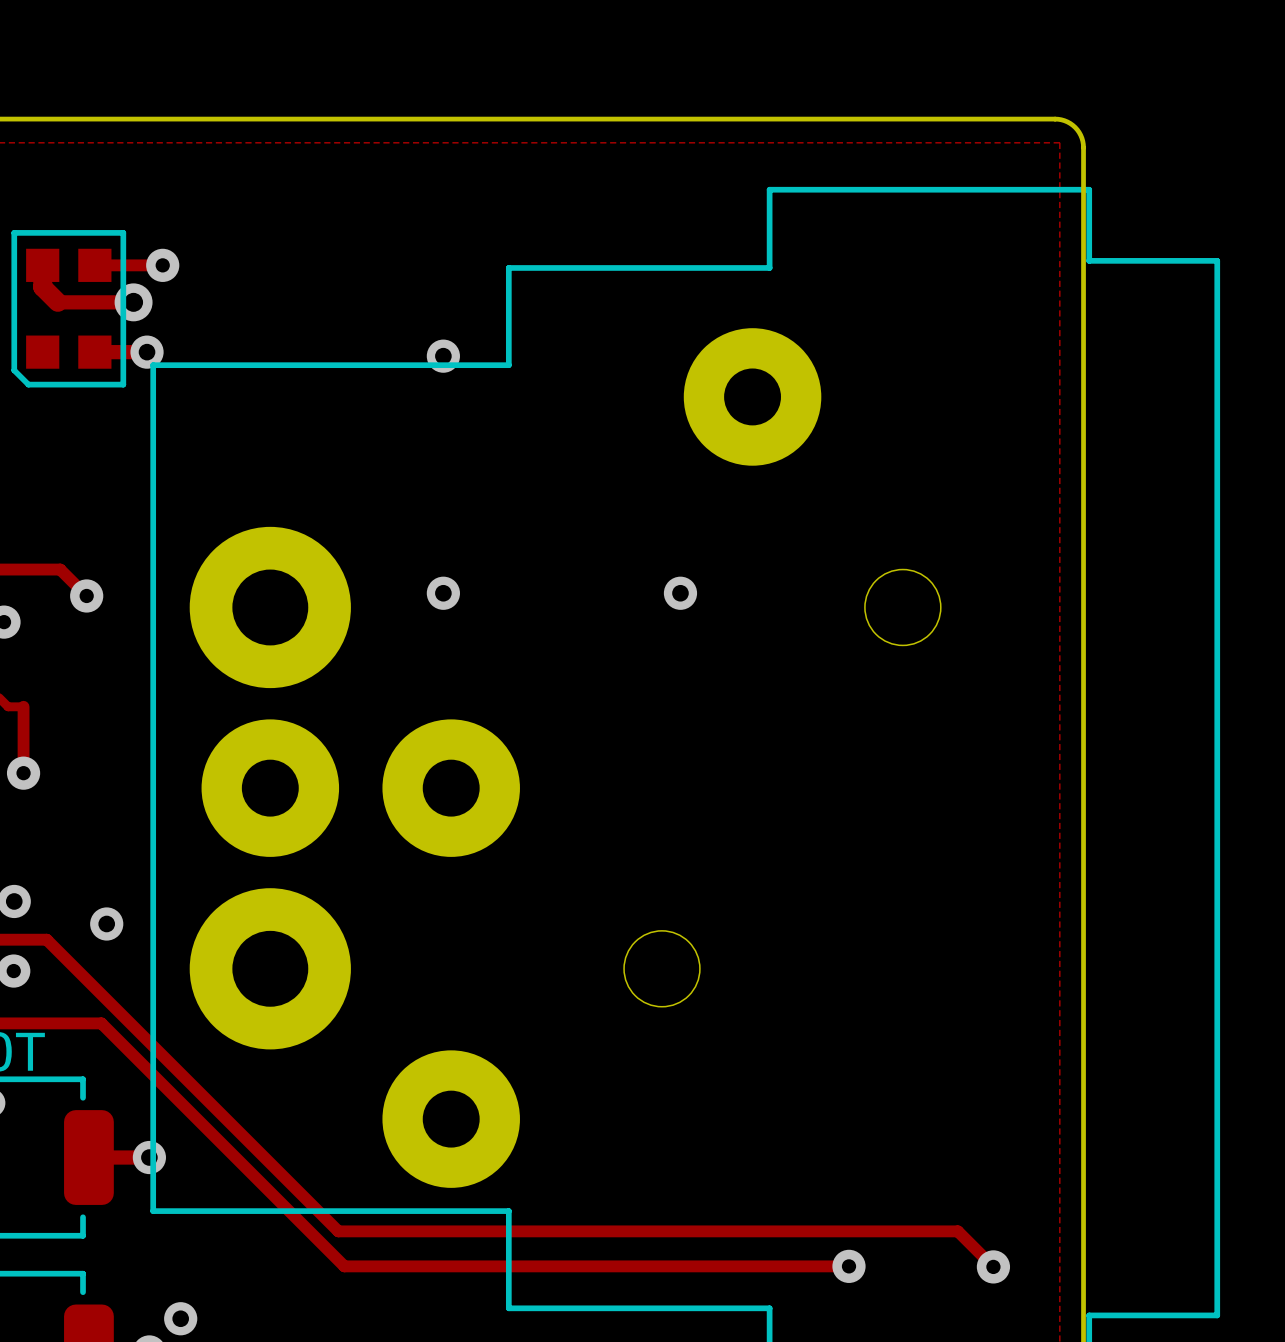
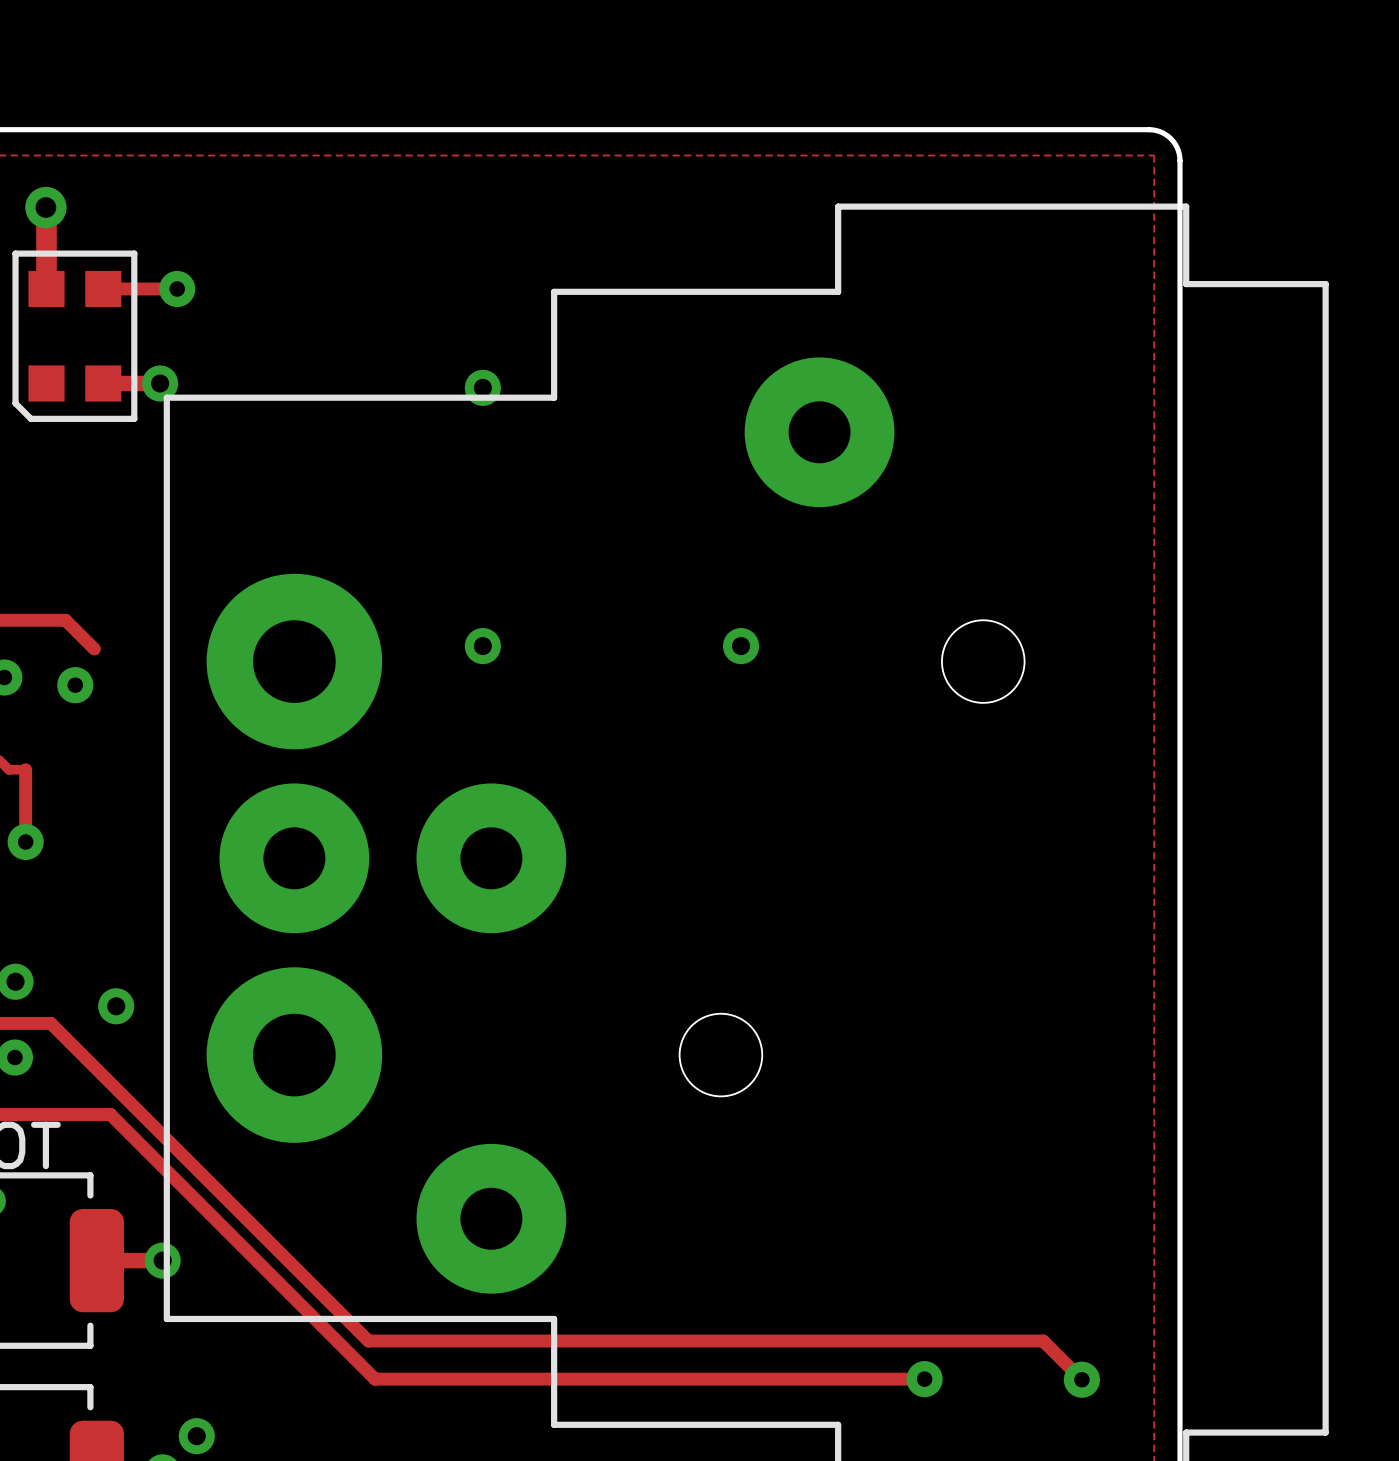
track: (42, 265) (42, 287) (57, 302) (133, 302) -> (46, 288) (46, 208)
via position: (133, 302) -> (45, 207)
via position: (86, 595) -> (75, 685)

